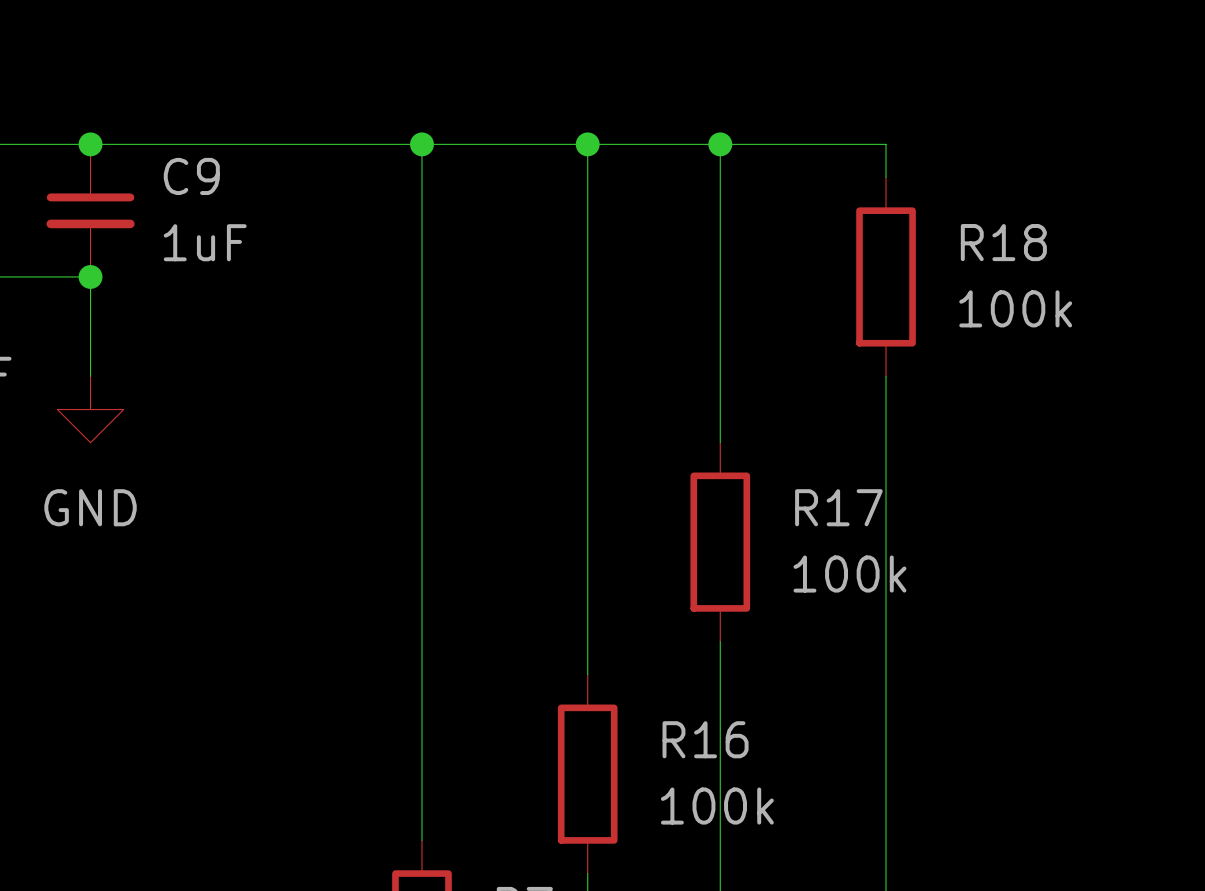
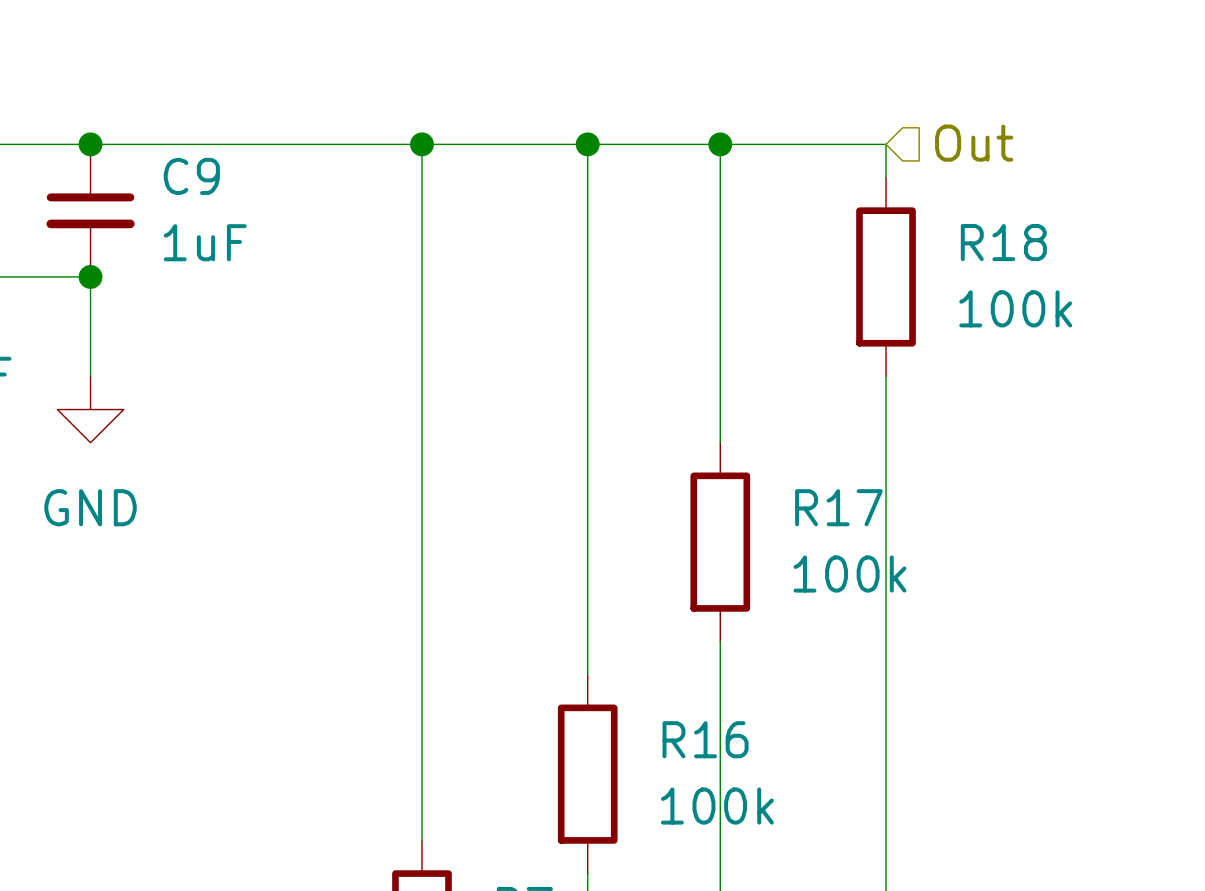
hierarchical label: none -> Out (974, 143)

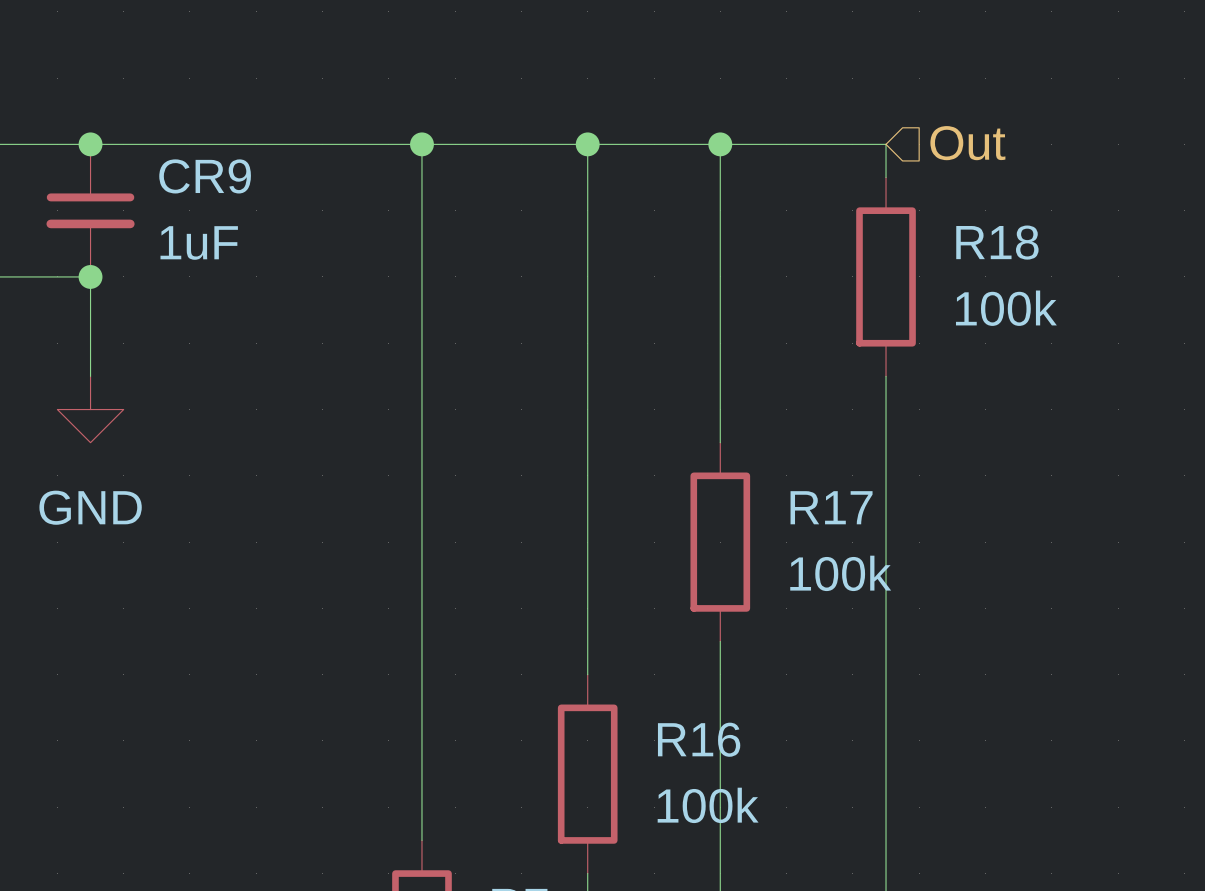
C9 name: C9 (191, 176) -> CR9 (205, 176)

